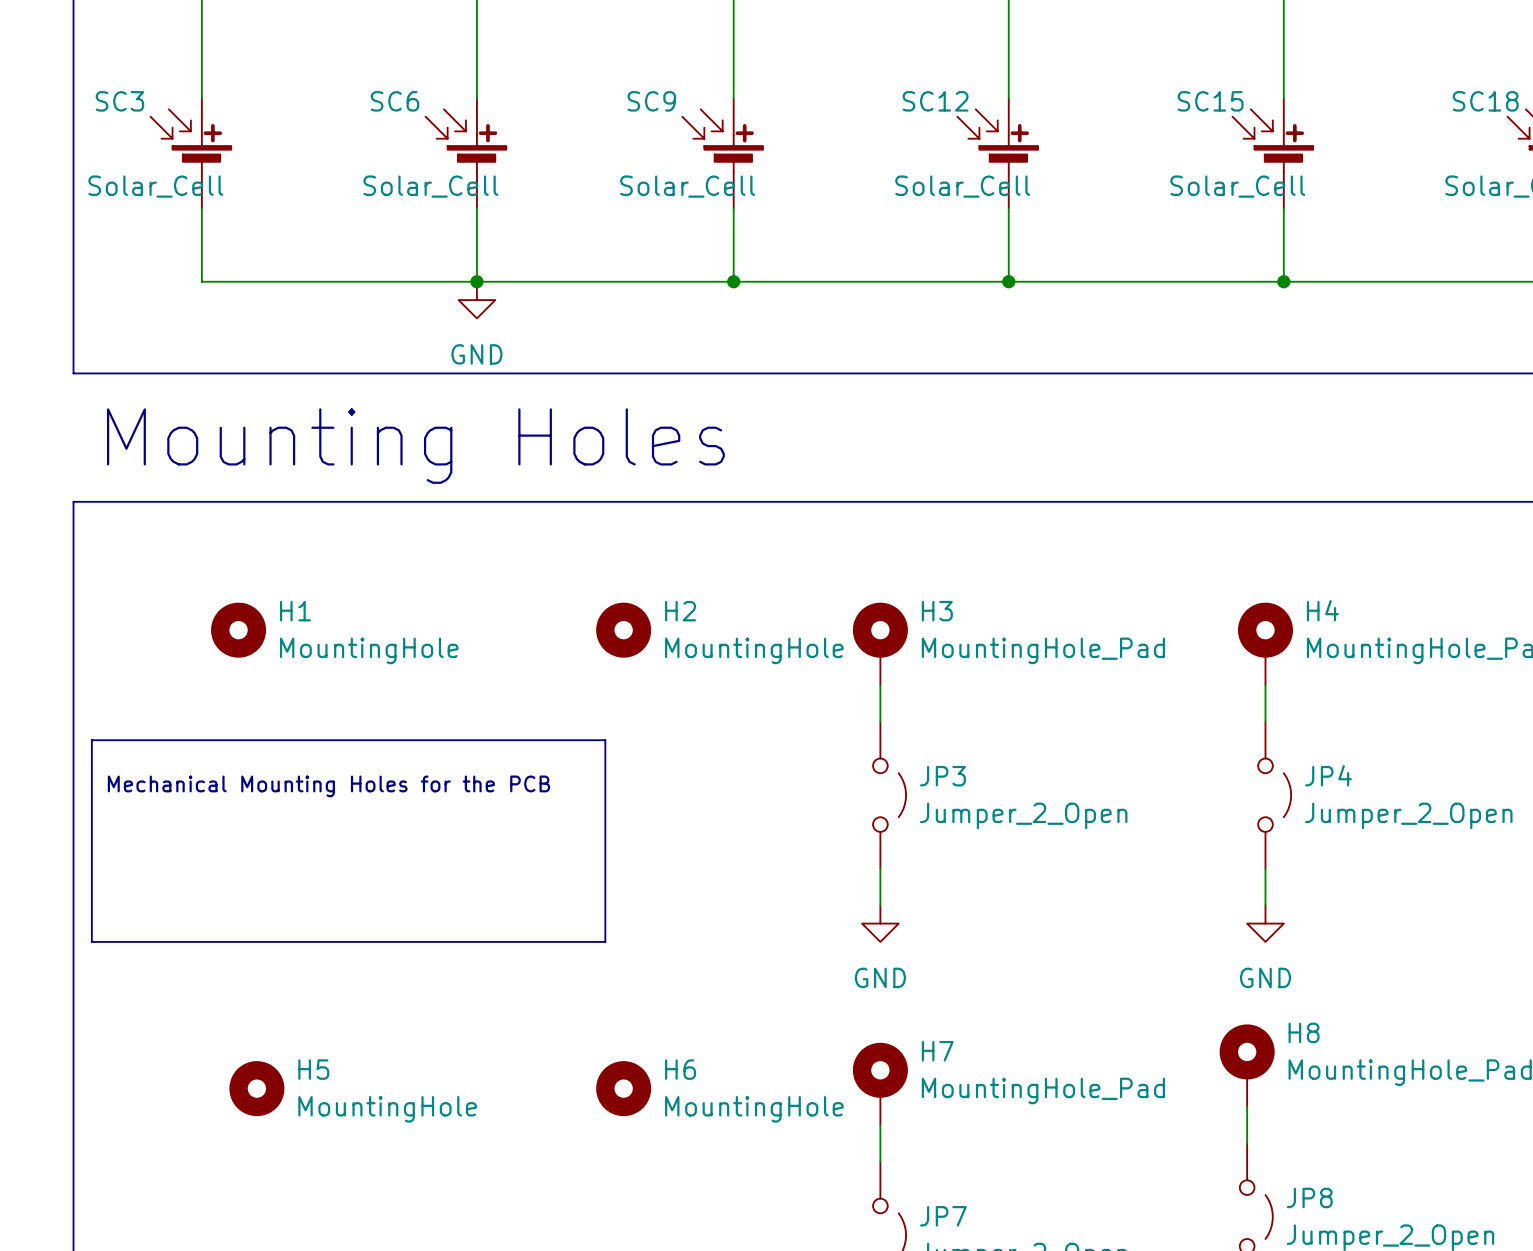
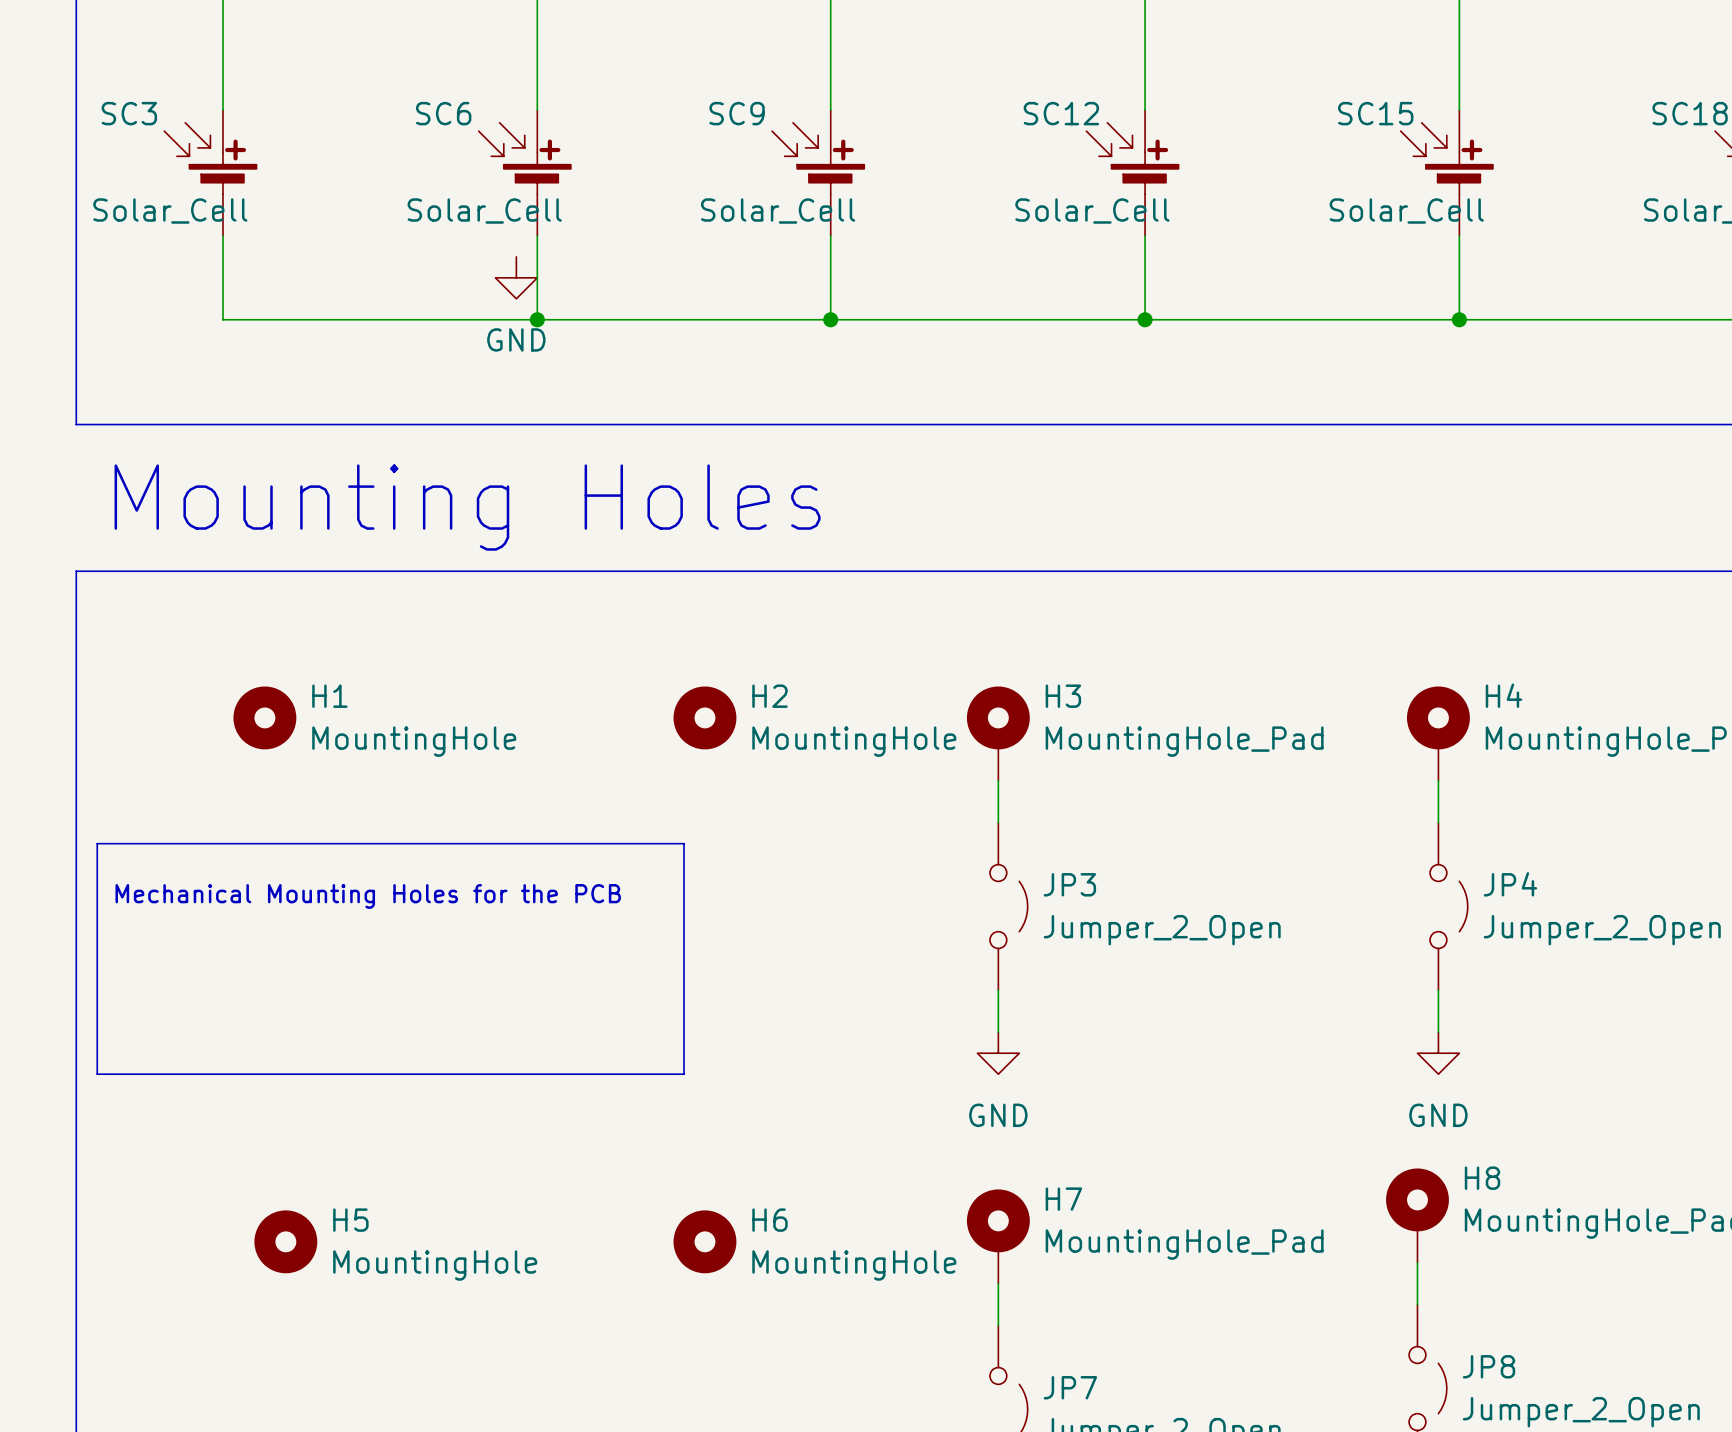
power symbol position: GND (476, 300) -> GND (516, 277)

